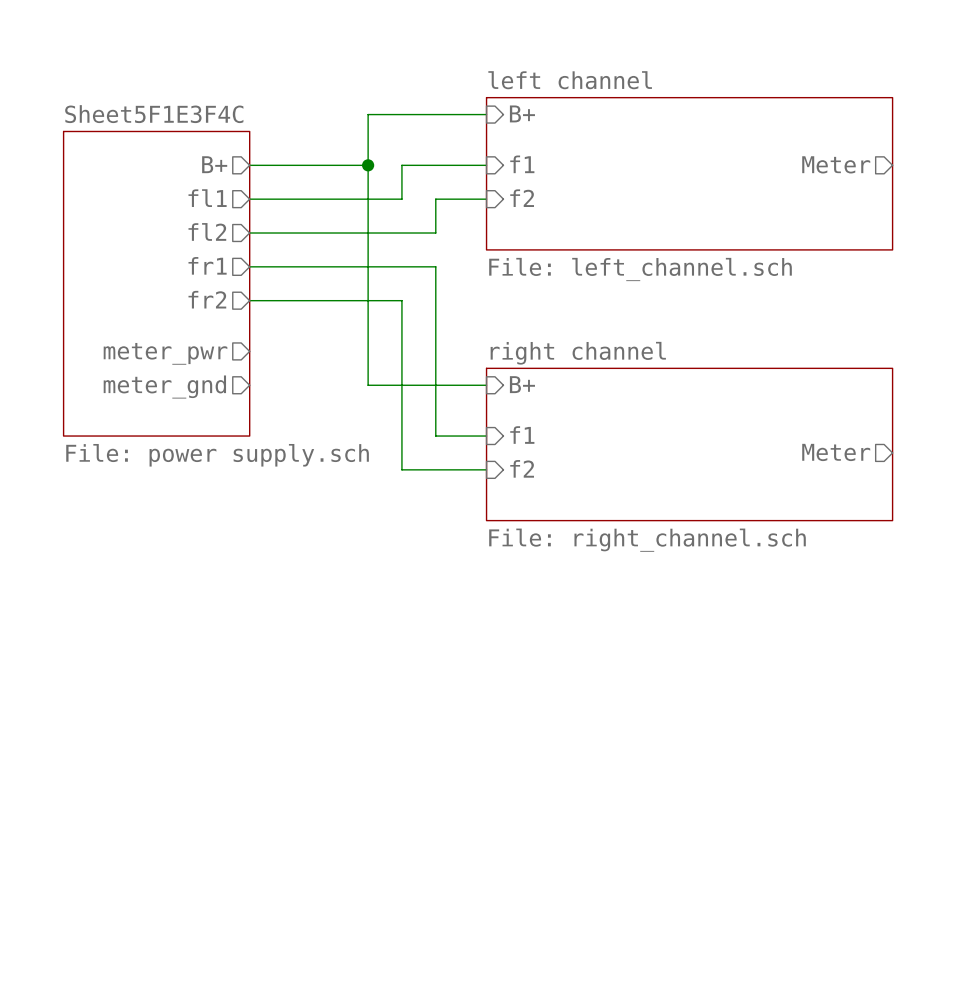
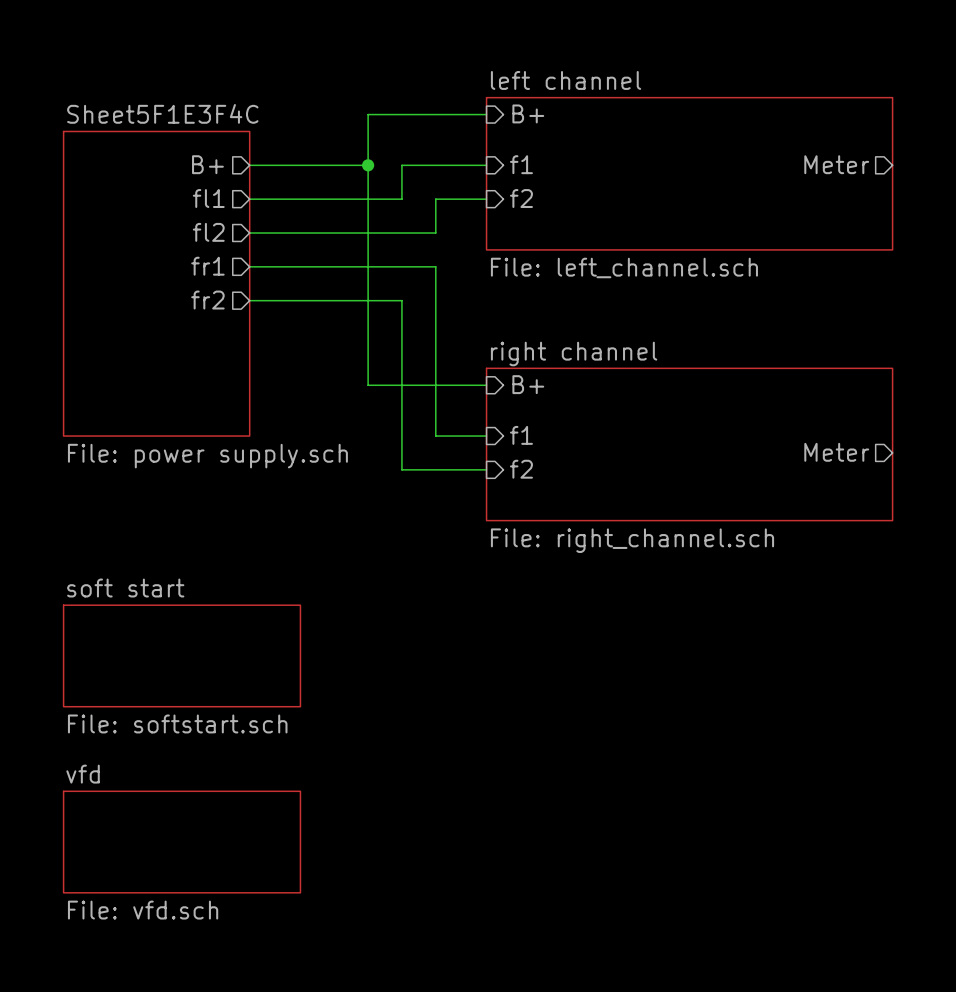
sheet pin: meter_pwr (165, 353) -> none
sheet pin: meter_gnd (164, 387) -> none
sheet soft start: none -> File: softstart.sch (182, 655)
sheet vfd: none -> File: vfd.sch (182, 842)

